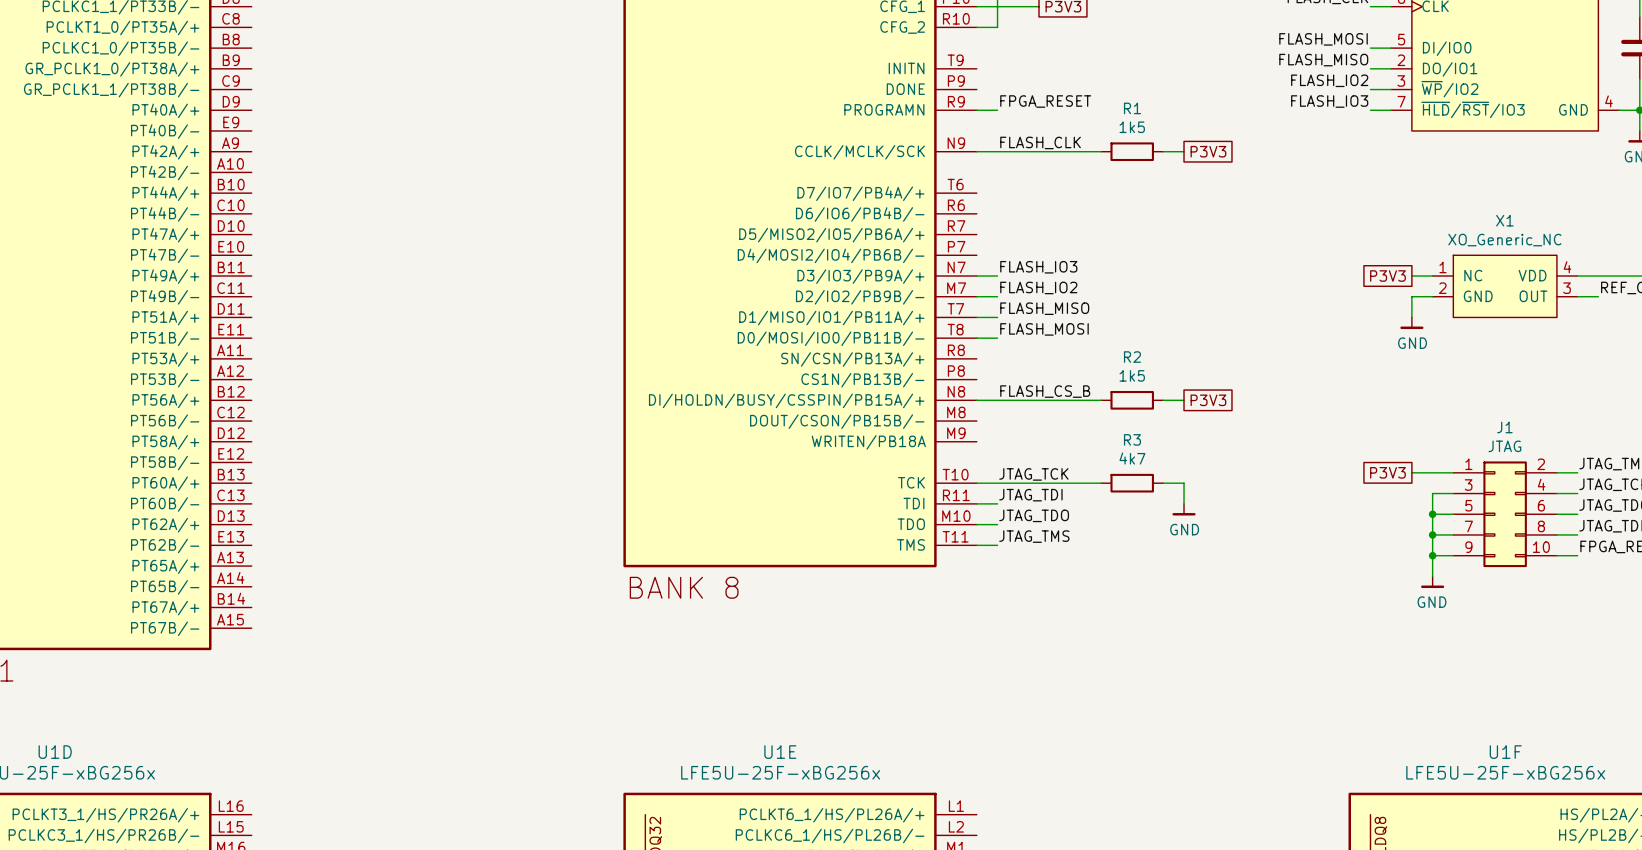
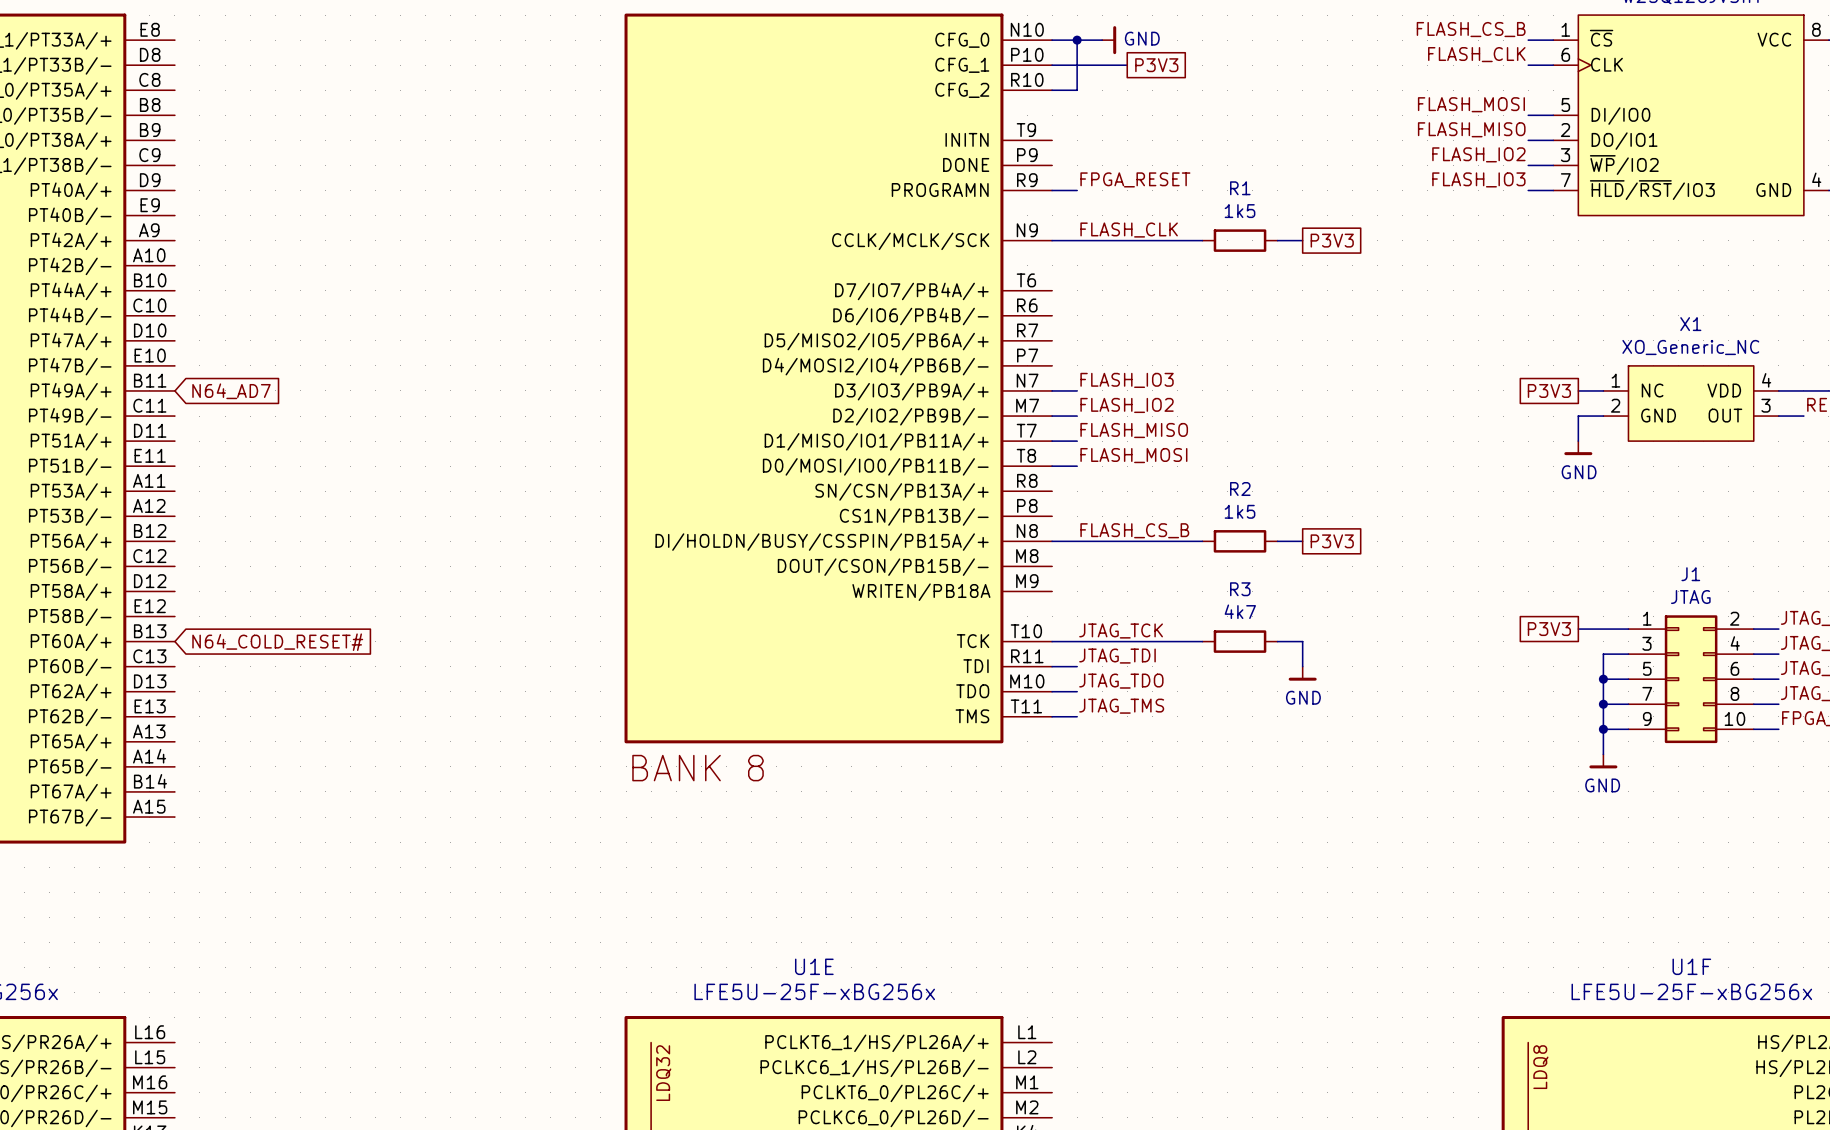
global label: none -> N64_AD7 (231, 391)
global label: none -> N64_COLD_RESET# (277, 642)

